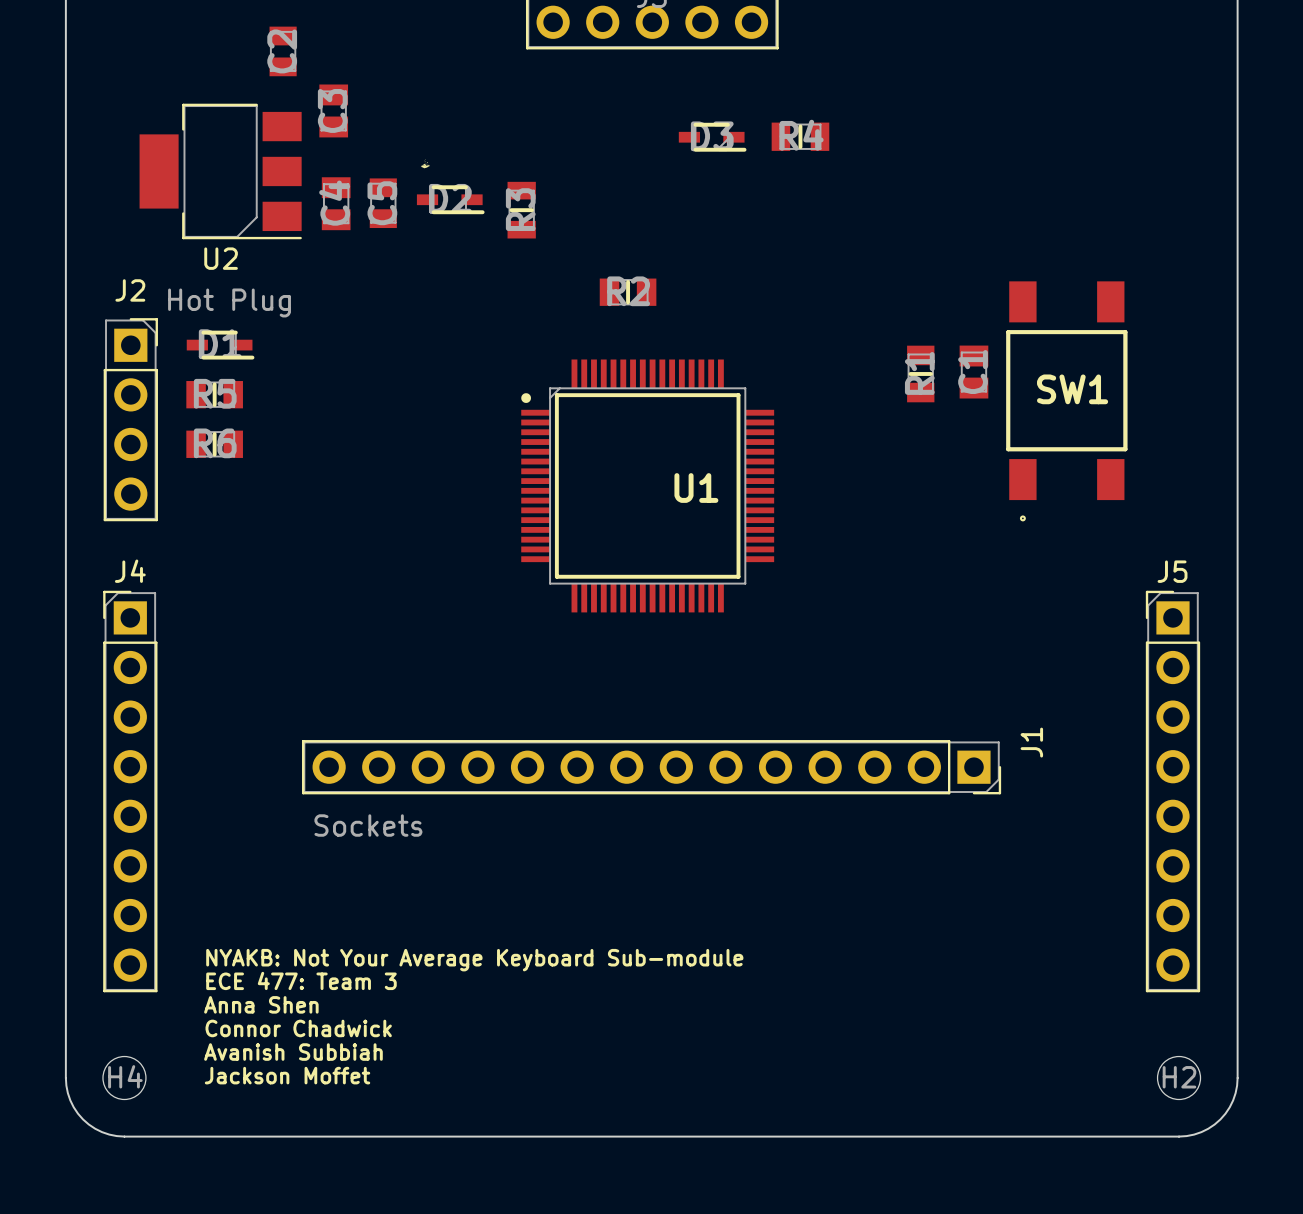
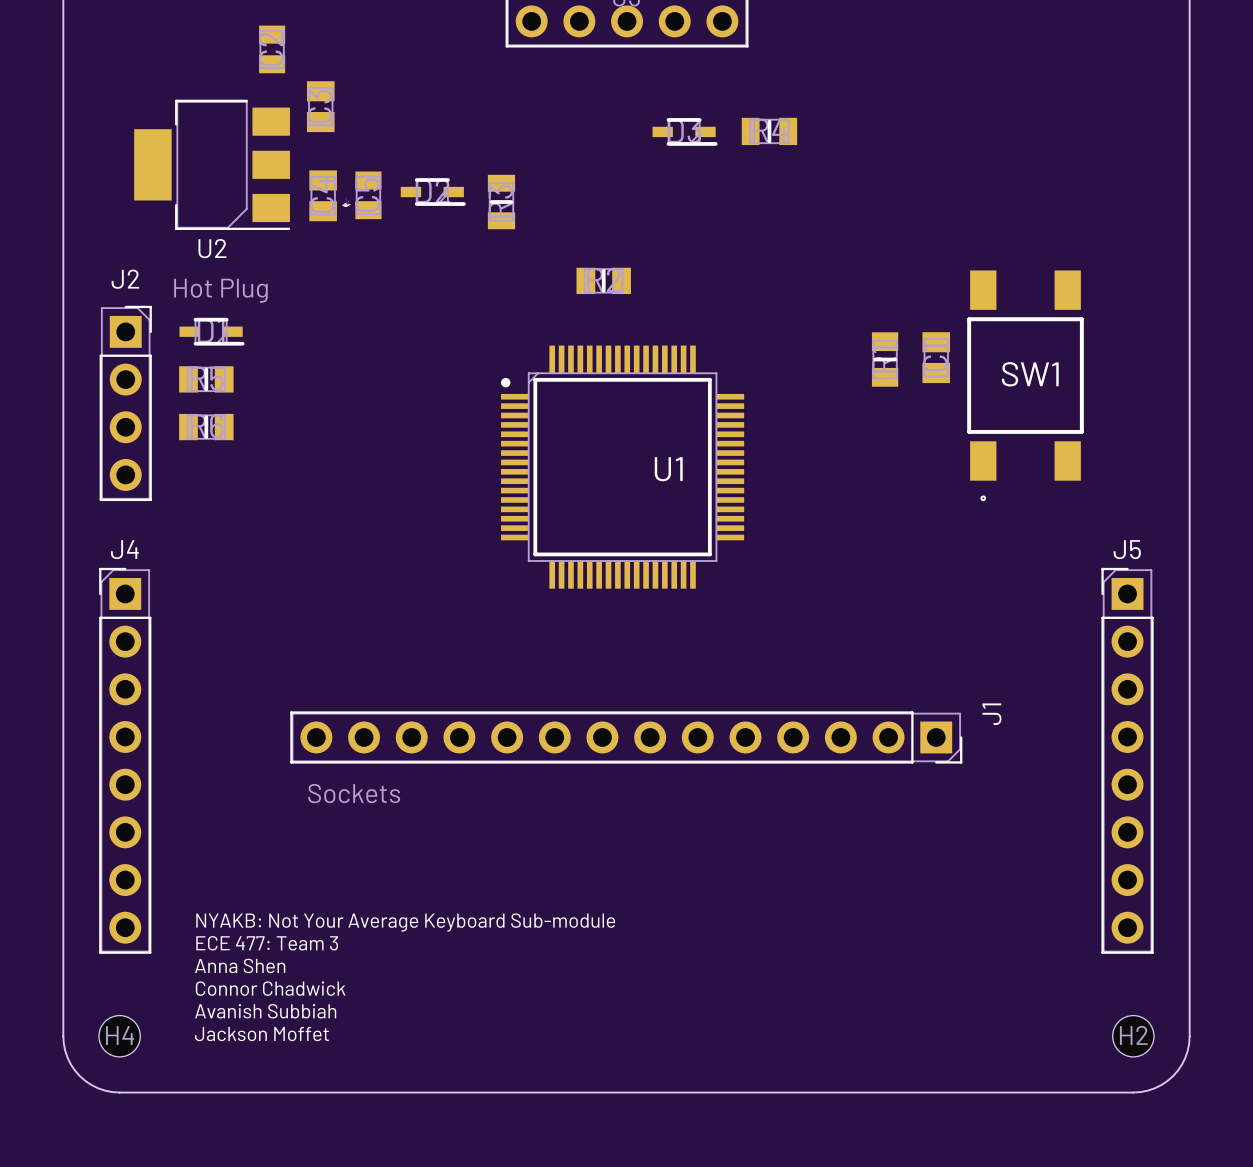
drawing position: (425, 163) -> (346, 202)

